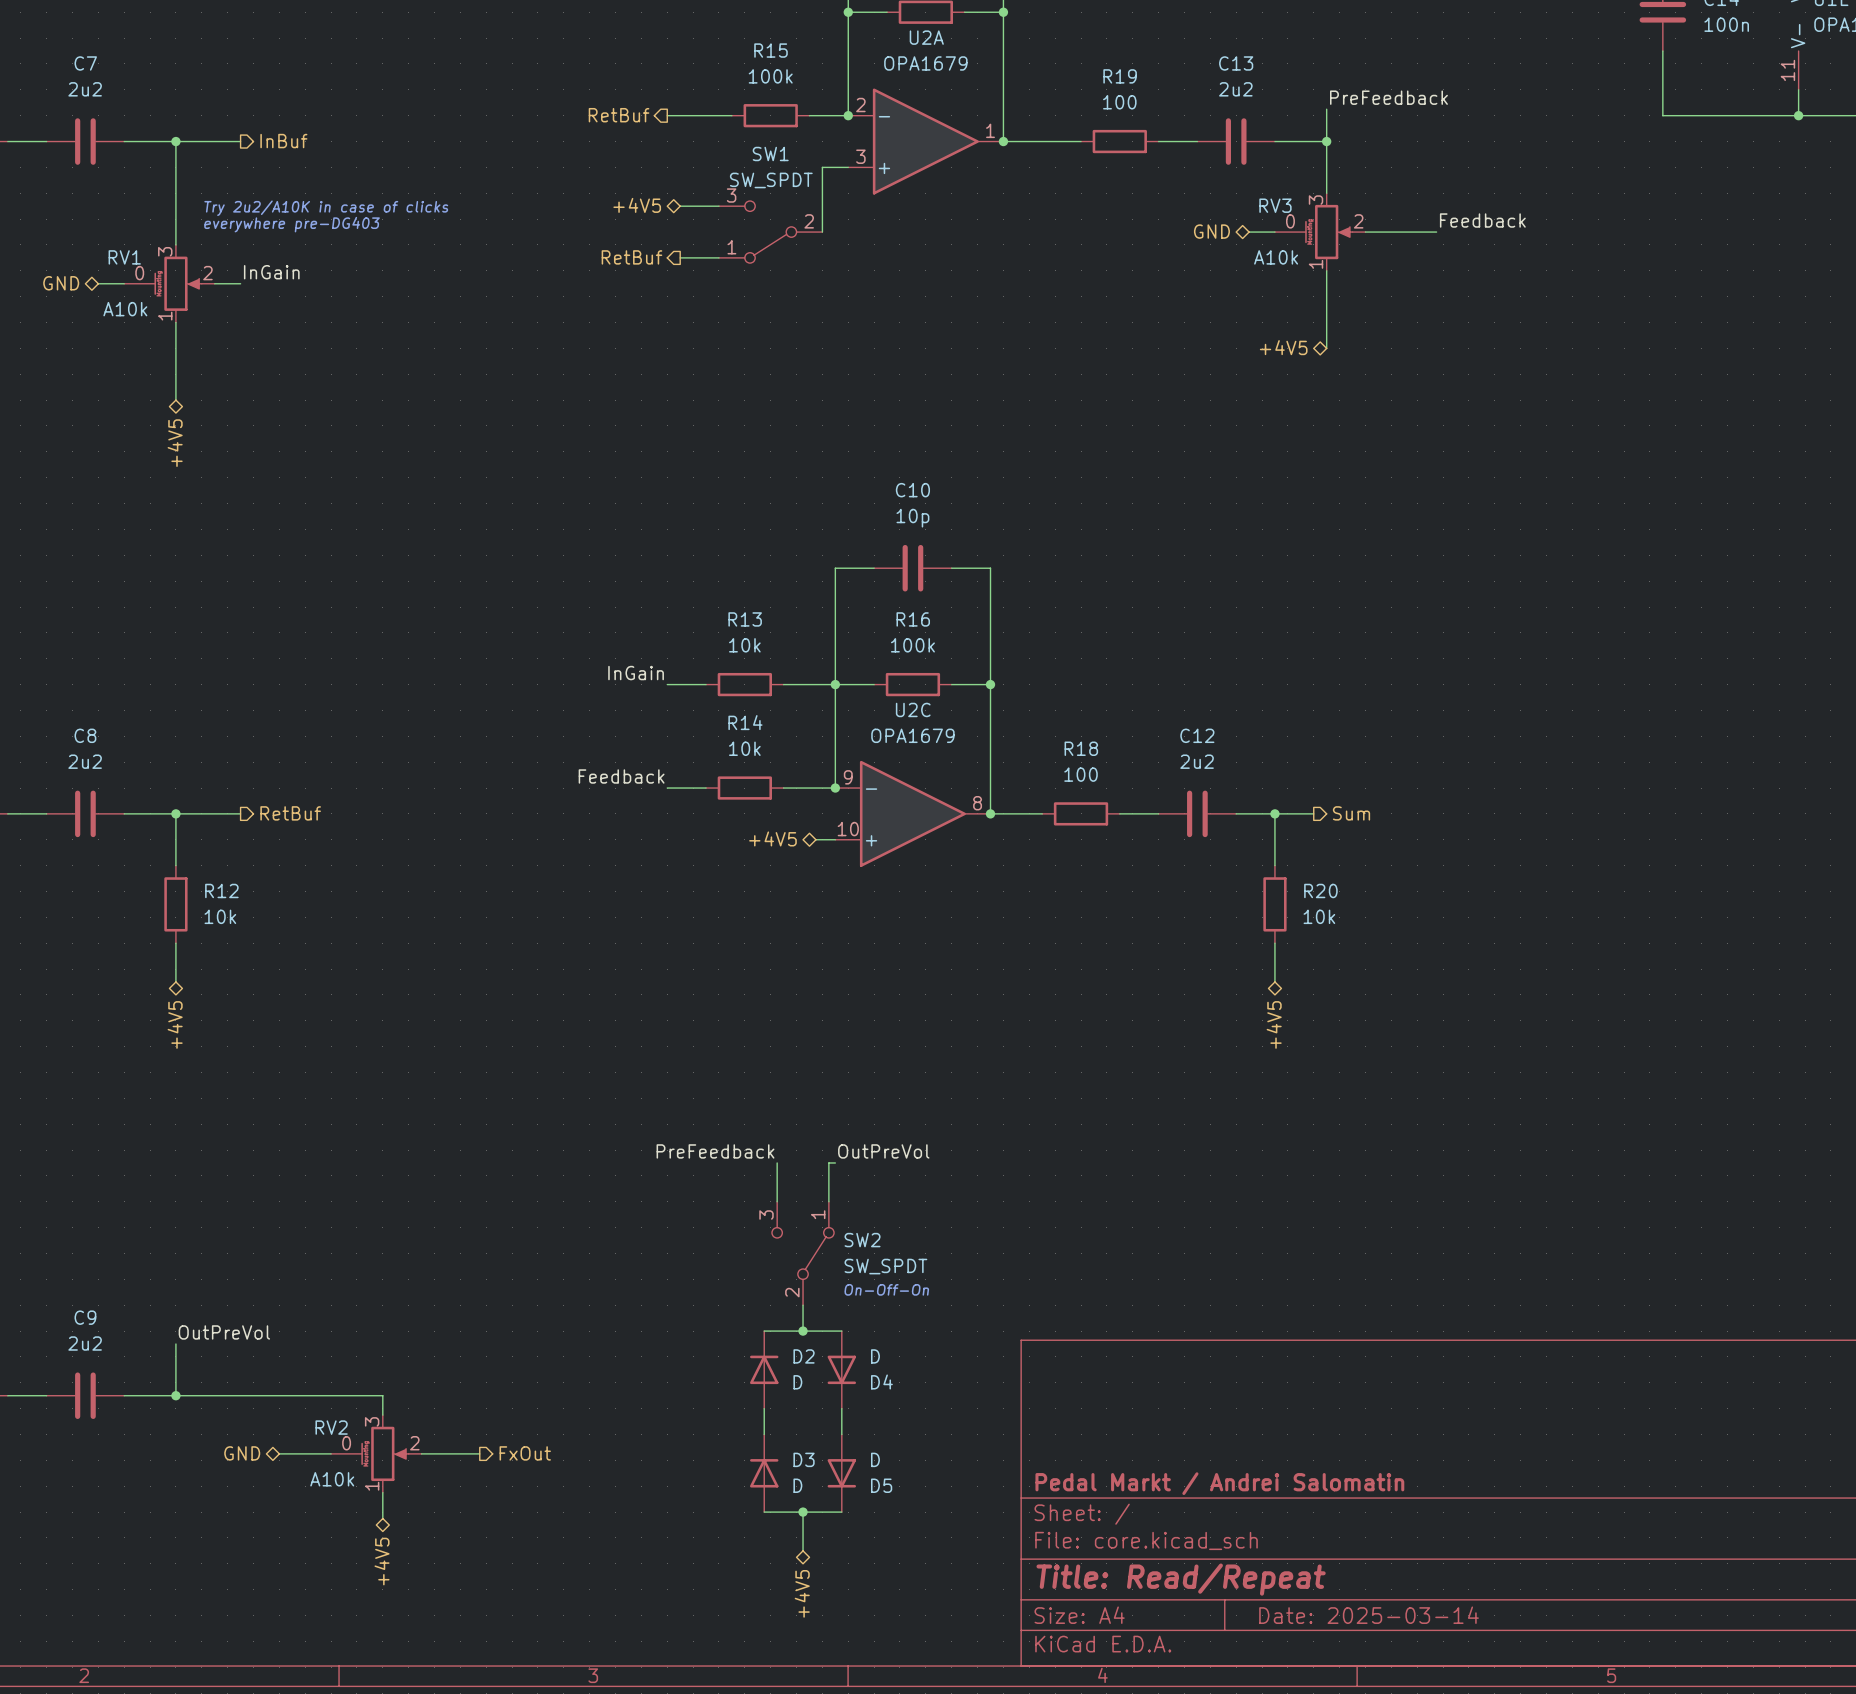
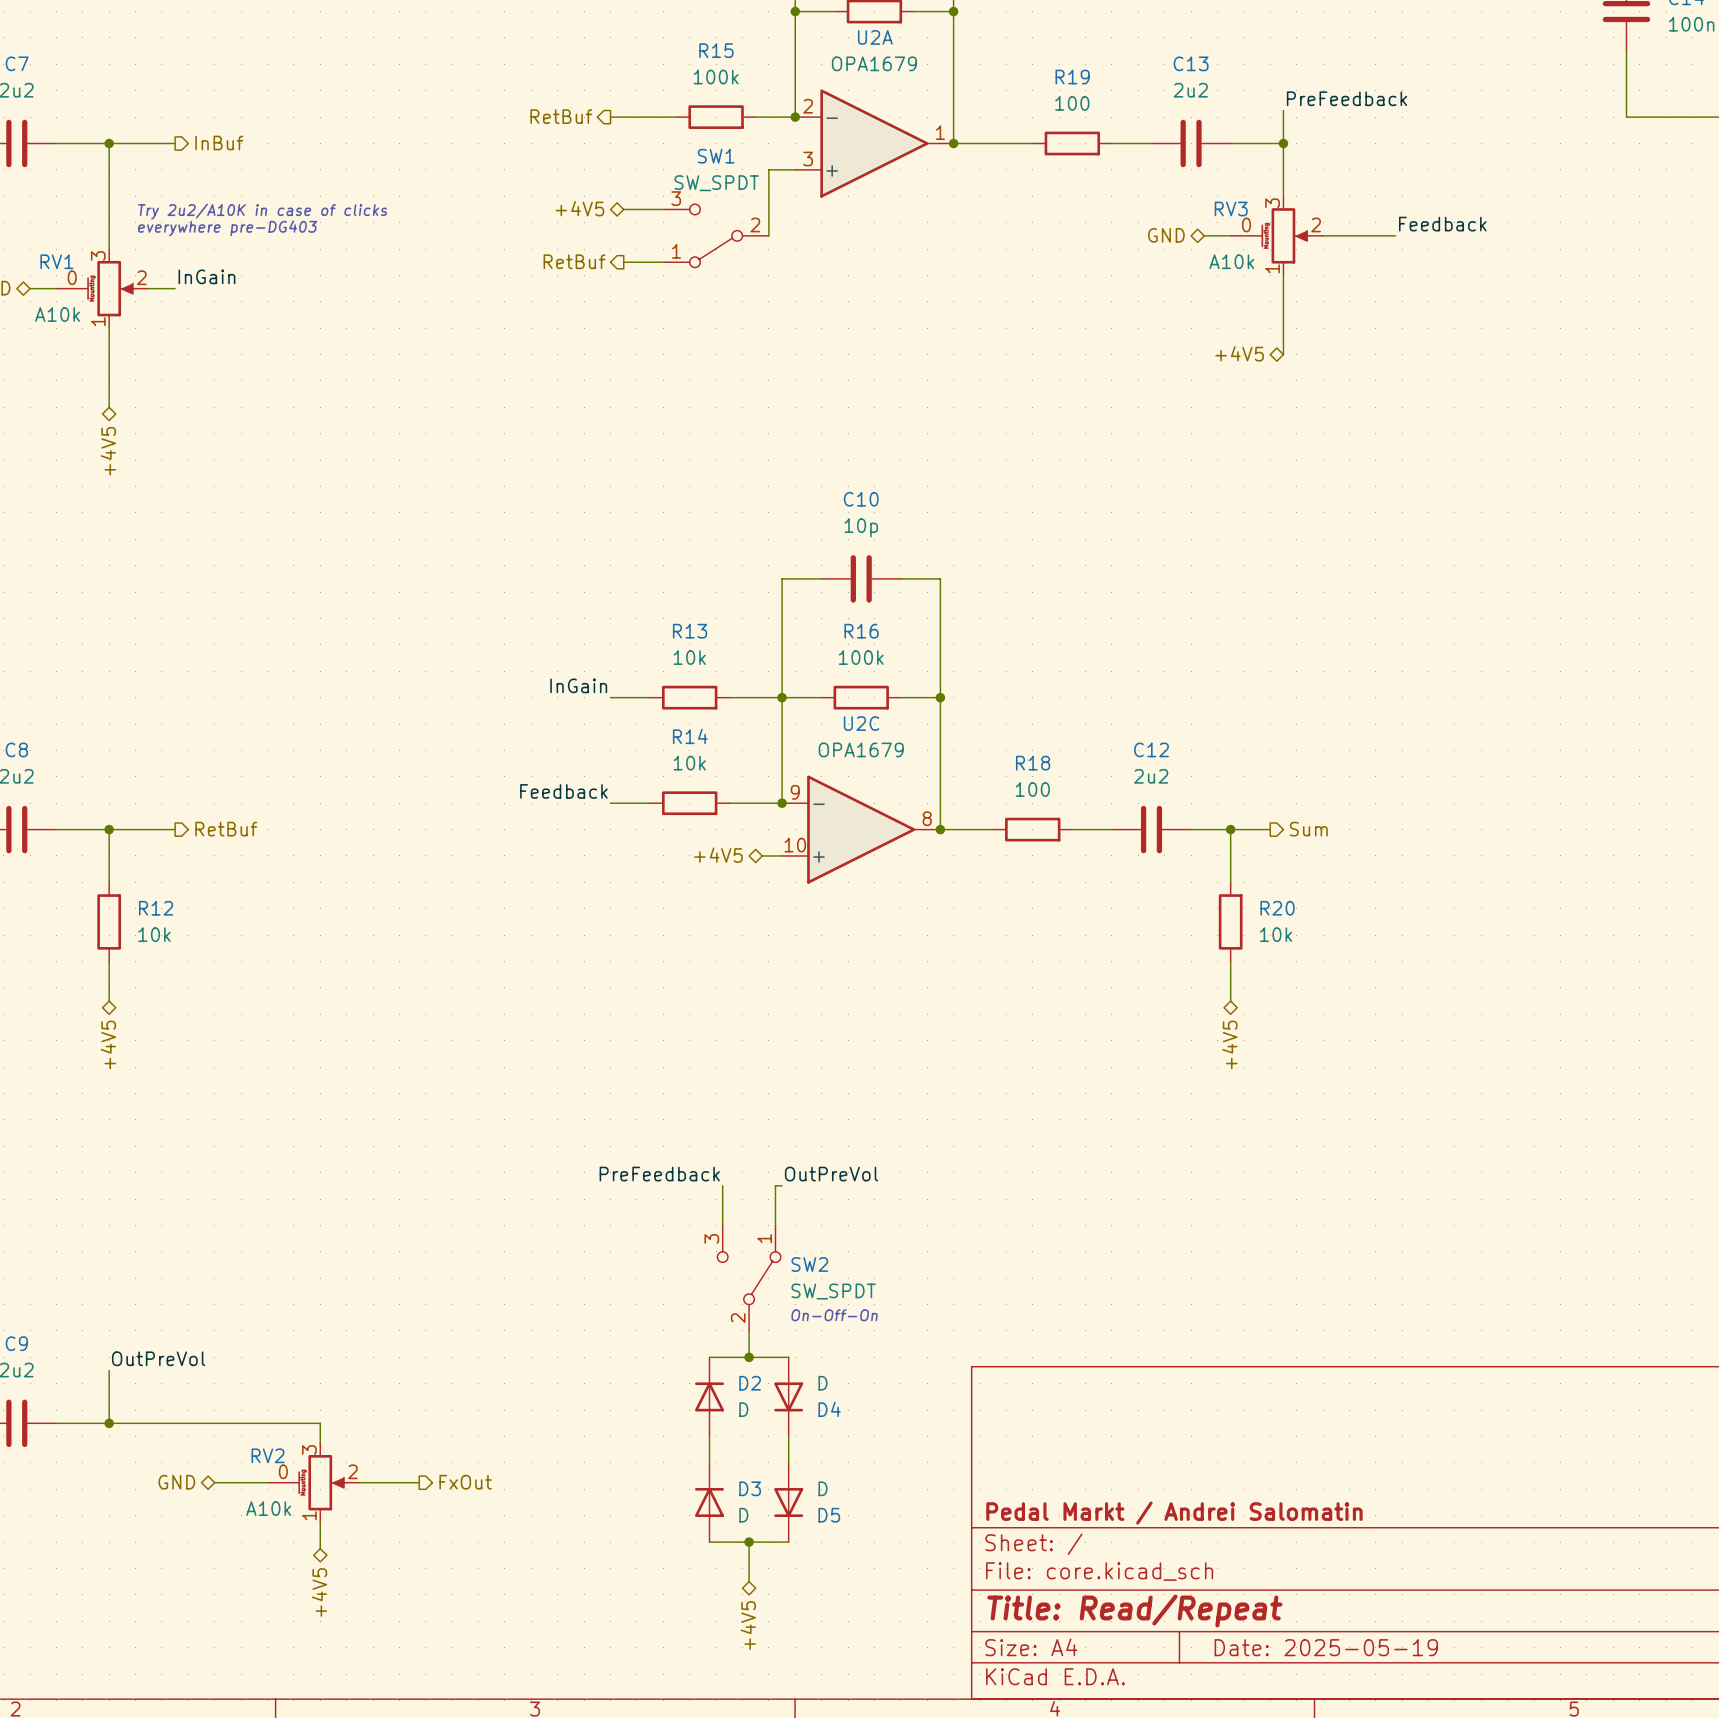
title block: Date: 2025-03-14 (1369, 1615) -> Date: 2025-05-19 (1326, 1647)

